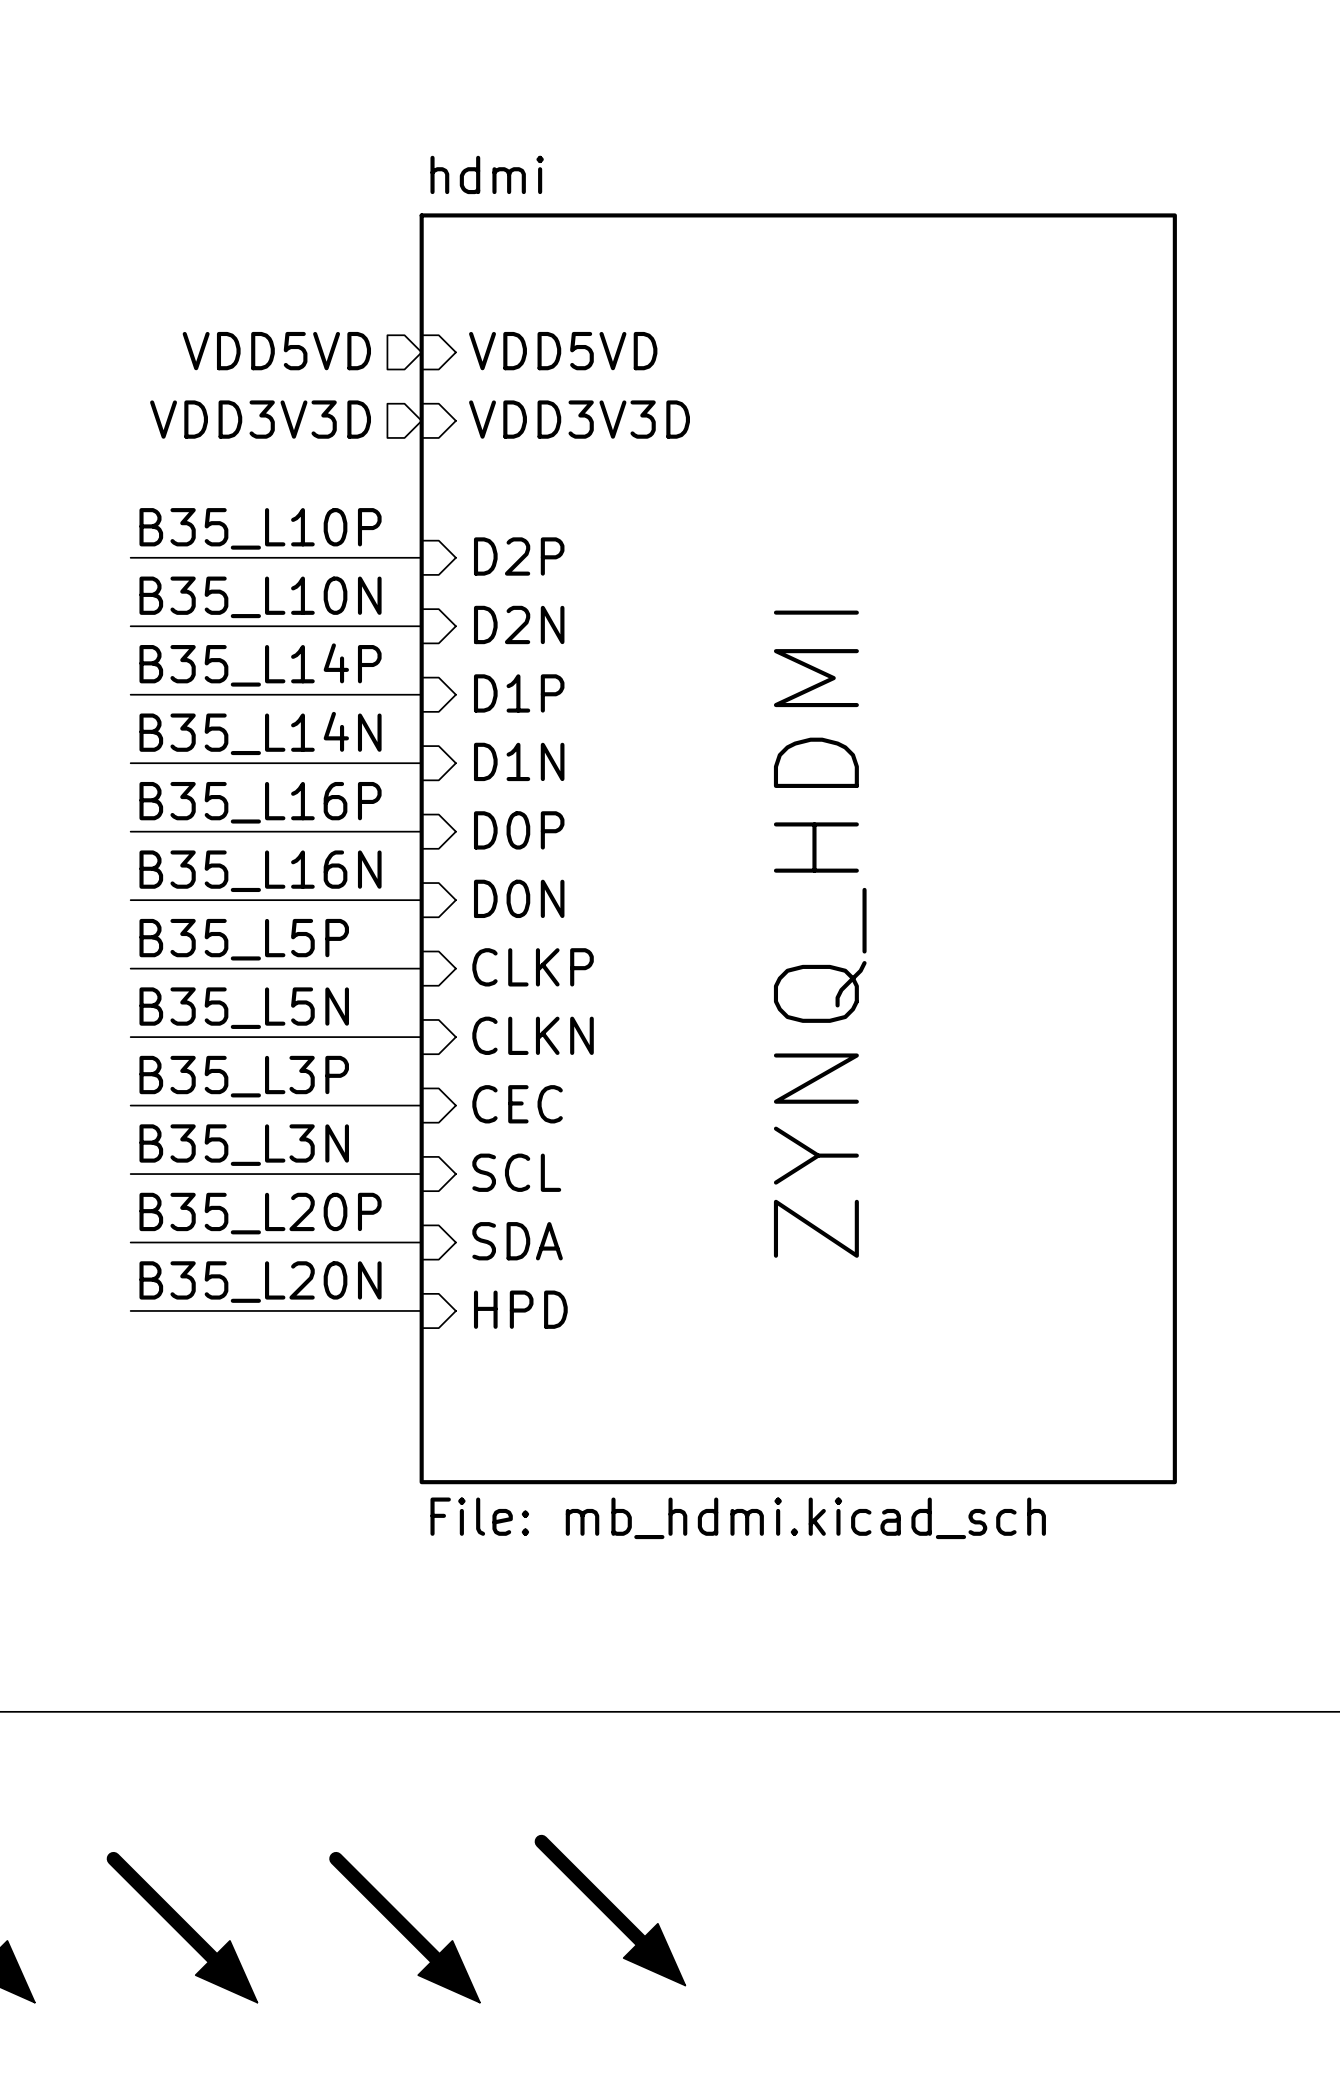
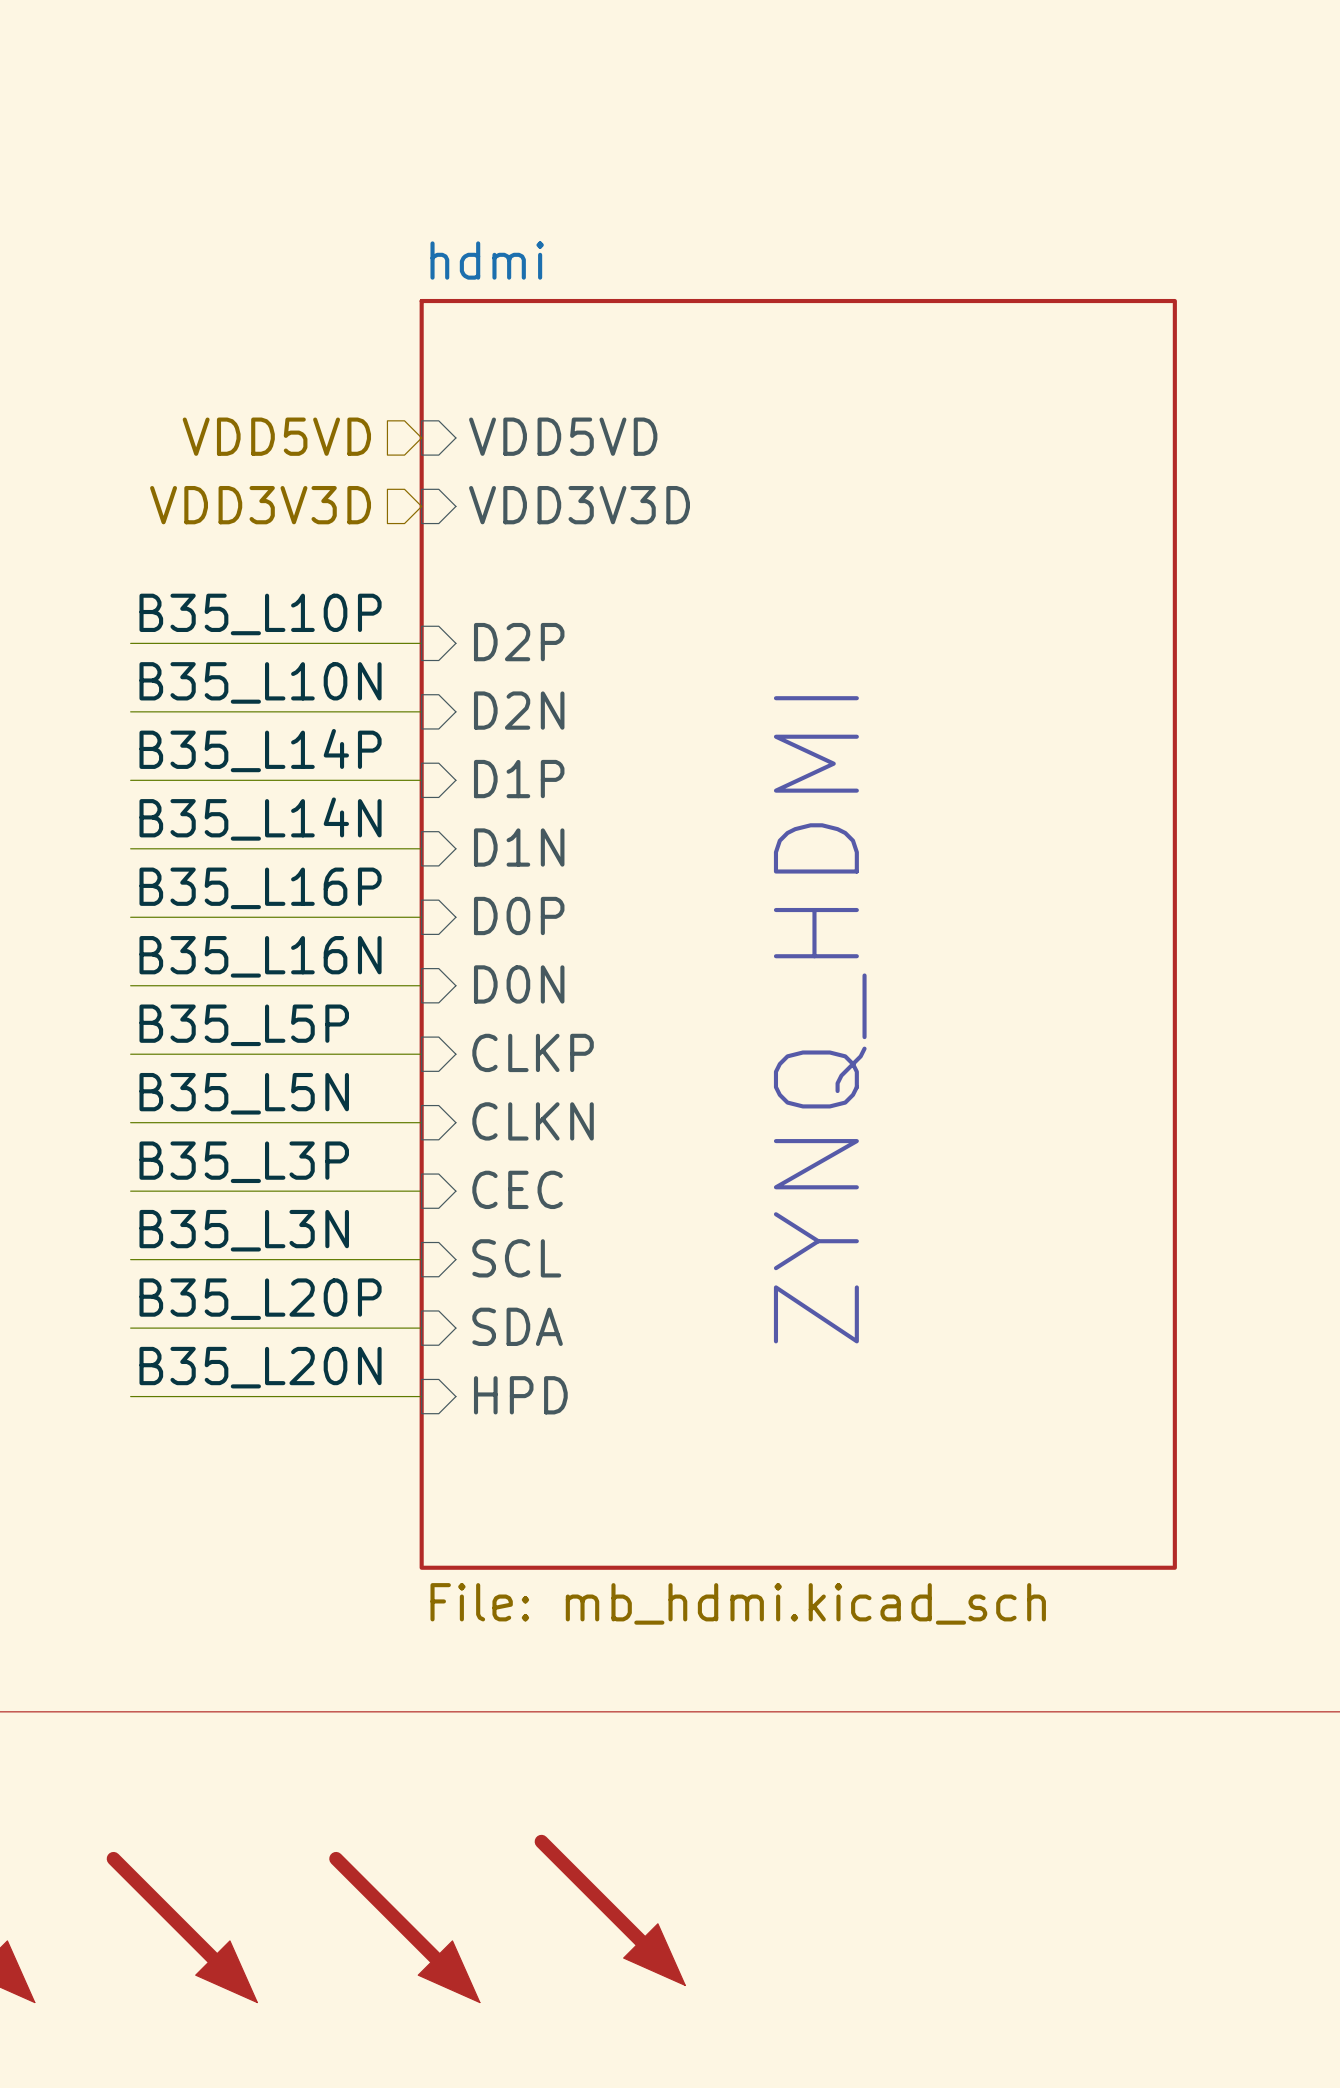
hierarchical label position: VDD5VD (276, 351) -> VDD5VD (276, 436)
sheet pin position: VDD5VD (563, 351) -> VDD5VD (563, 436)
hierarchical label position: VDD3V3D (260, 419) -> VDD3V3D (260, 505)
sheet pin position: VDD3V3D (579, 419) -> VDD3V3D (579, 505)
label position: B35_L10P (260, 528) -> B35_L10P (260, 614)
sheet pin position: D2P (519, 556) -> D2P (519, 642)
wire: (130, 557) (421, 557) -> (130, 643) (421, 643)
label position: B35_L10N (260, 597) -> B35_L10N (260, 682)
sheet pin position: D2N (519, 624) -> D2N (519, 710)
wire: (130, 626) (421, 626) -> (130, 711) (421, 711)
label position: B35_L14P (260, 665) -> B35_L14P (260, 750)
sheet pin position: D1P (519, 693) -> D1P (519, 779)
wire: (130, 694) (421, 694) -> (130, 780) (421, 780)
label position: B35_L14N (260, 733) -> B35_L14N (260, 819)
sheet pin position: D1N (519, 761) -> D1N (519, 847)
wire: (130, 763) (421, 763) -> (130, 848) (421, 848)
label position: B35_L16P (260, 802) -> B35_L16P (260, 888)
sheet pin position: D0P (519, 830) -> D0P (519, 915)
wire: (130, 831) (421, 831) -> (130, 917) (421, 917)
sheet hdmi position: (798, 848) -> (798, 934)
label position: B35_L16N (260, 871) -> B35_L16N (260, 956)
sheet pin position: D0N (519, 898) -> D0N (519, 984)
wire: (130, 900) (421, 900) -> (130, 985) (421, 985)
text position: ZYNQ_HDMI (820, 934) -> ZYNQ_HDMI (820, 1019)
label position: B35_L5P (244, 939) -> B35_L5P (244, 1025)
sheet pin position: CLKP (533, 967) -> CLKP (533, 1052)
wire: (130, 968) (421, 968) -> (130, 1054) (421, 1054)
label position: B35_L5N (244, 1008) -> B35_L5N (244, 1093)
sheet pin position: CLKN (533, 1035) -> CLKN (533, 1121)
wire: (130, 1037) (421, 1037) -> (130, 1122) (421, 1122)
label position: B35_L3P (244, 1076) -> B35_L3P (244, 1162)
sheet pin position: CEC (517, 1104) -> CEC (517, 1189)
wire: (130, 1105) (421, 1105) -> (130, 1191) (421, 1191)
label position: B35_L3N (244, 1145) -> B35_L3N (244, 1230)
sheet pin position: SCL (516, 1172) -> SCL (516, 1258)
wire: (130, 1174) (421, 1174) -> (130, 1259) (421, 1259)
label position: B35_L20P (260, 1213) -> B35_L20P (260, 1299)
sheet pin position: SDA (517, 1241) -> SDA (517, 1326)
wire: (130, 1242) (421, 1242) -> (130, 1328) (421, 1328)
label position: B35_L20N (260, 1282) -> B35_L20N (260, 1367)
sheet pin position: HPD (520, 1309) -> HPD (520, 1395)
wire: (130, 1310) (421, 1310) -> (130, 1396) (421, 1396)

